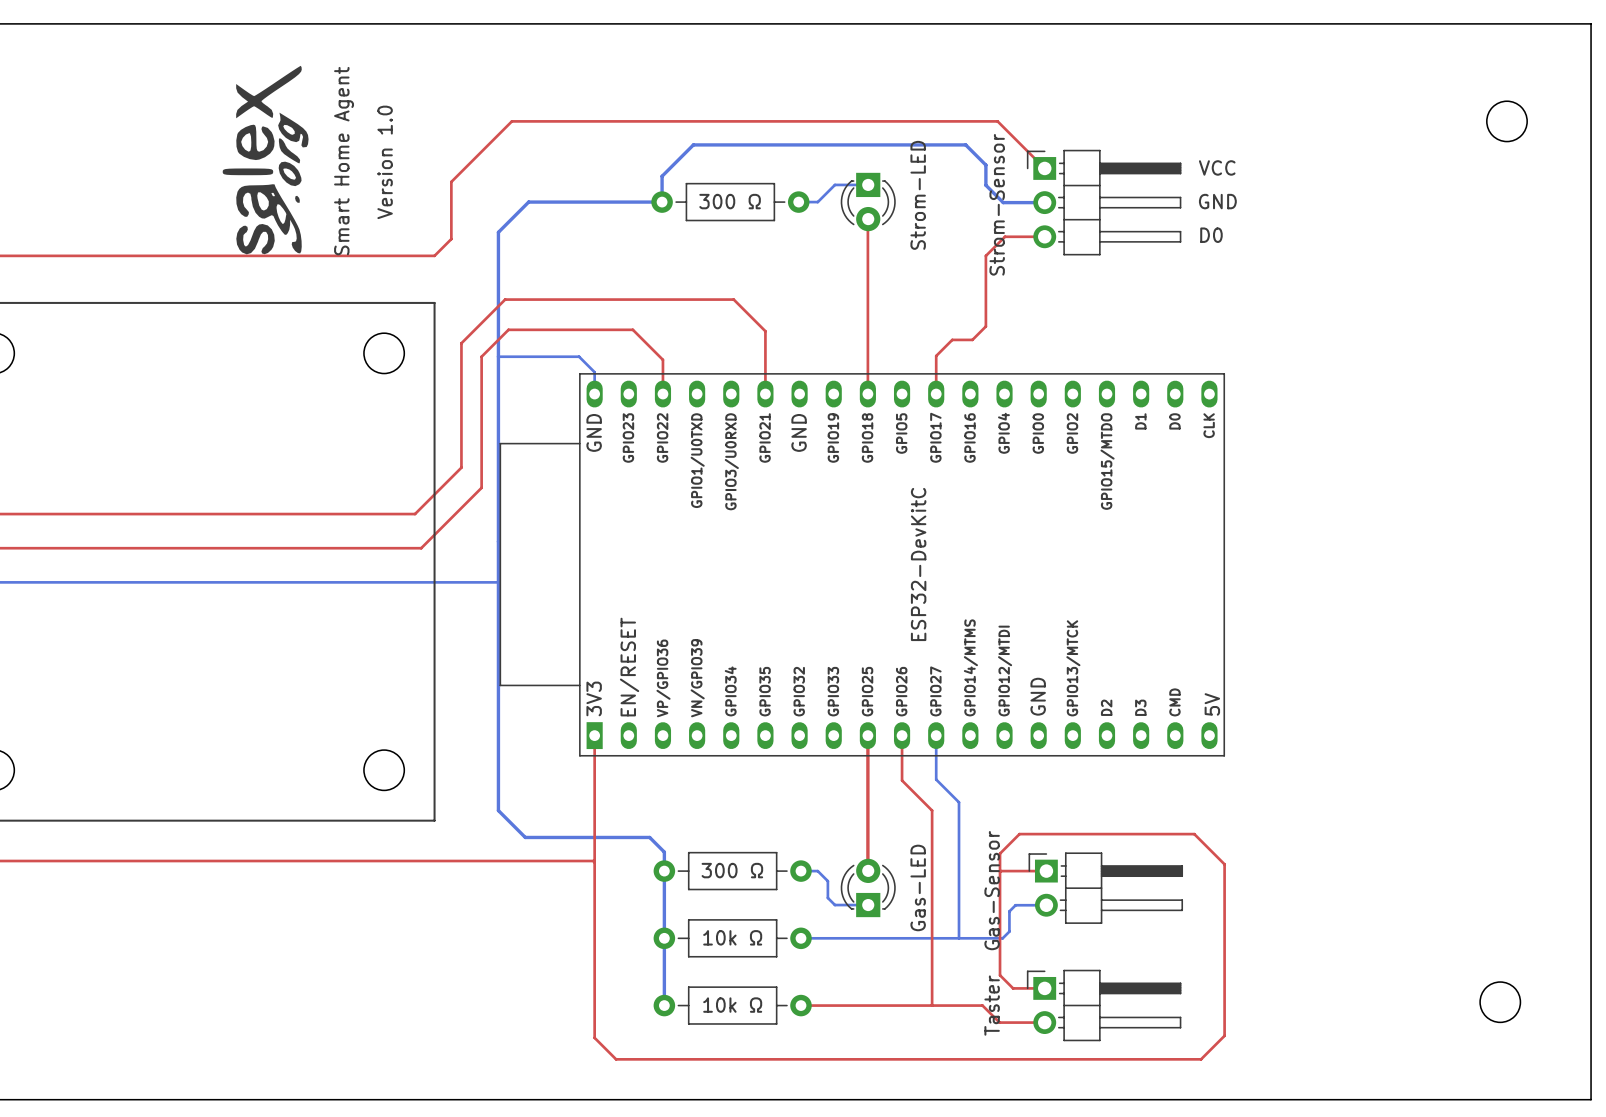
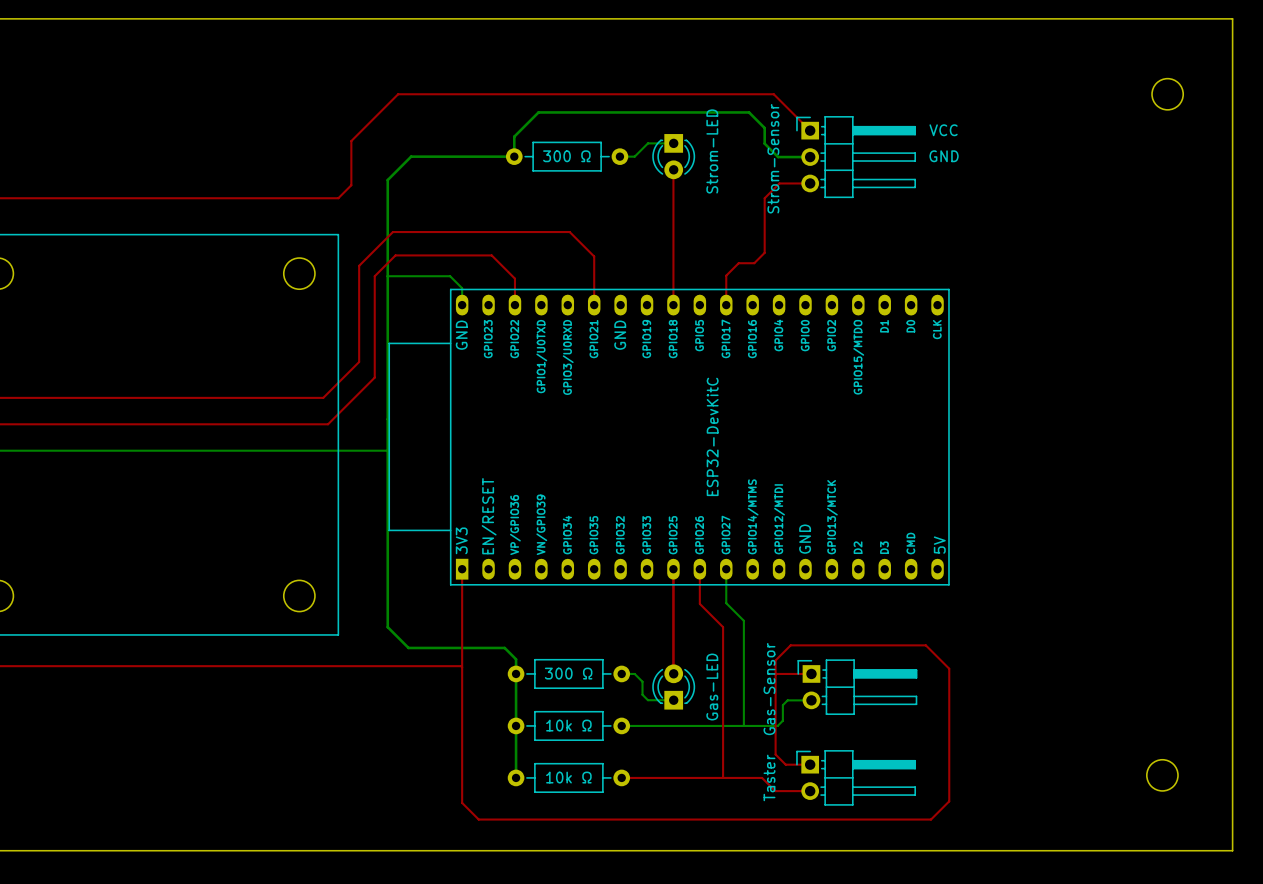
drawing: [222, 65, 309, 255] -> none
text: Smart Home Agent (344, 161) -> none
text: Version 1.0 (385, 162) -> none
part text: D0 (1211, 235) -> none

